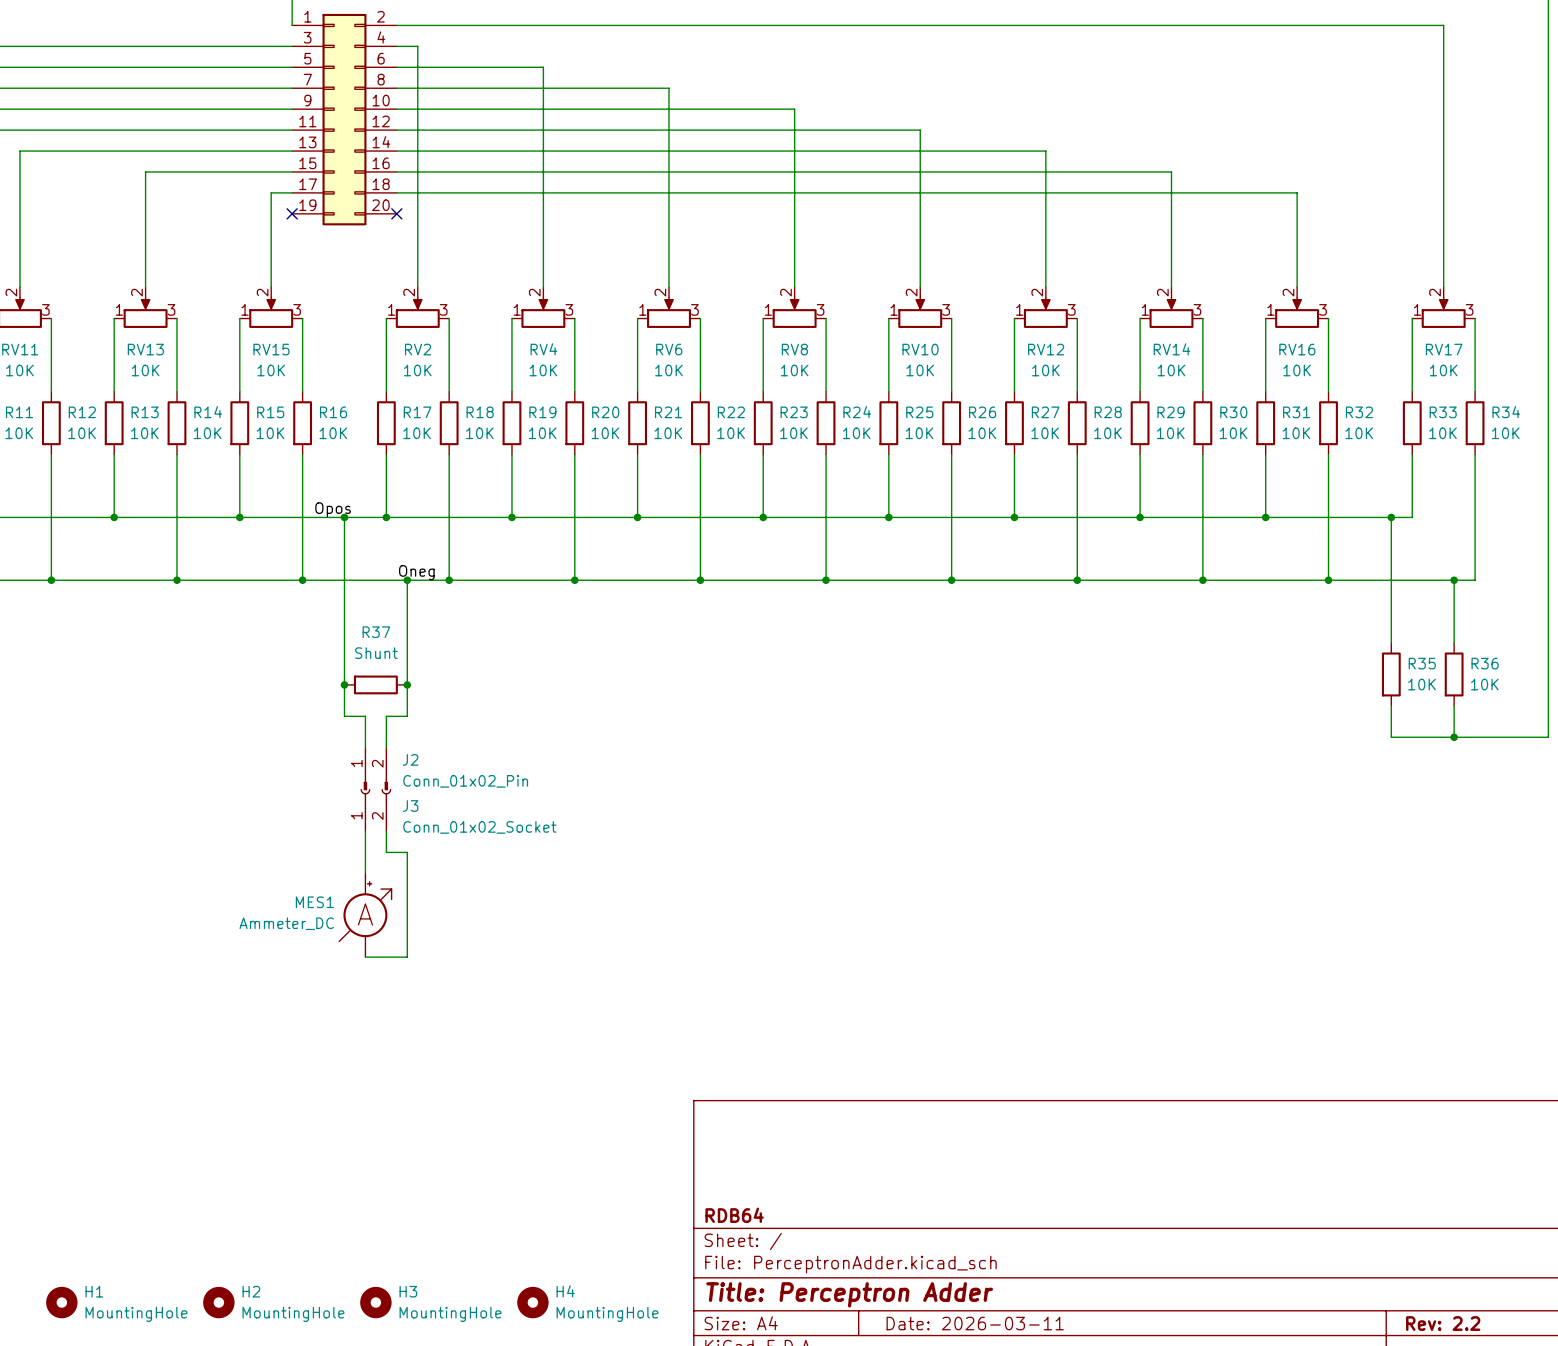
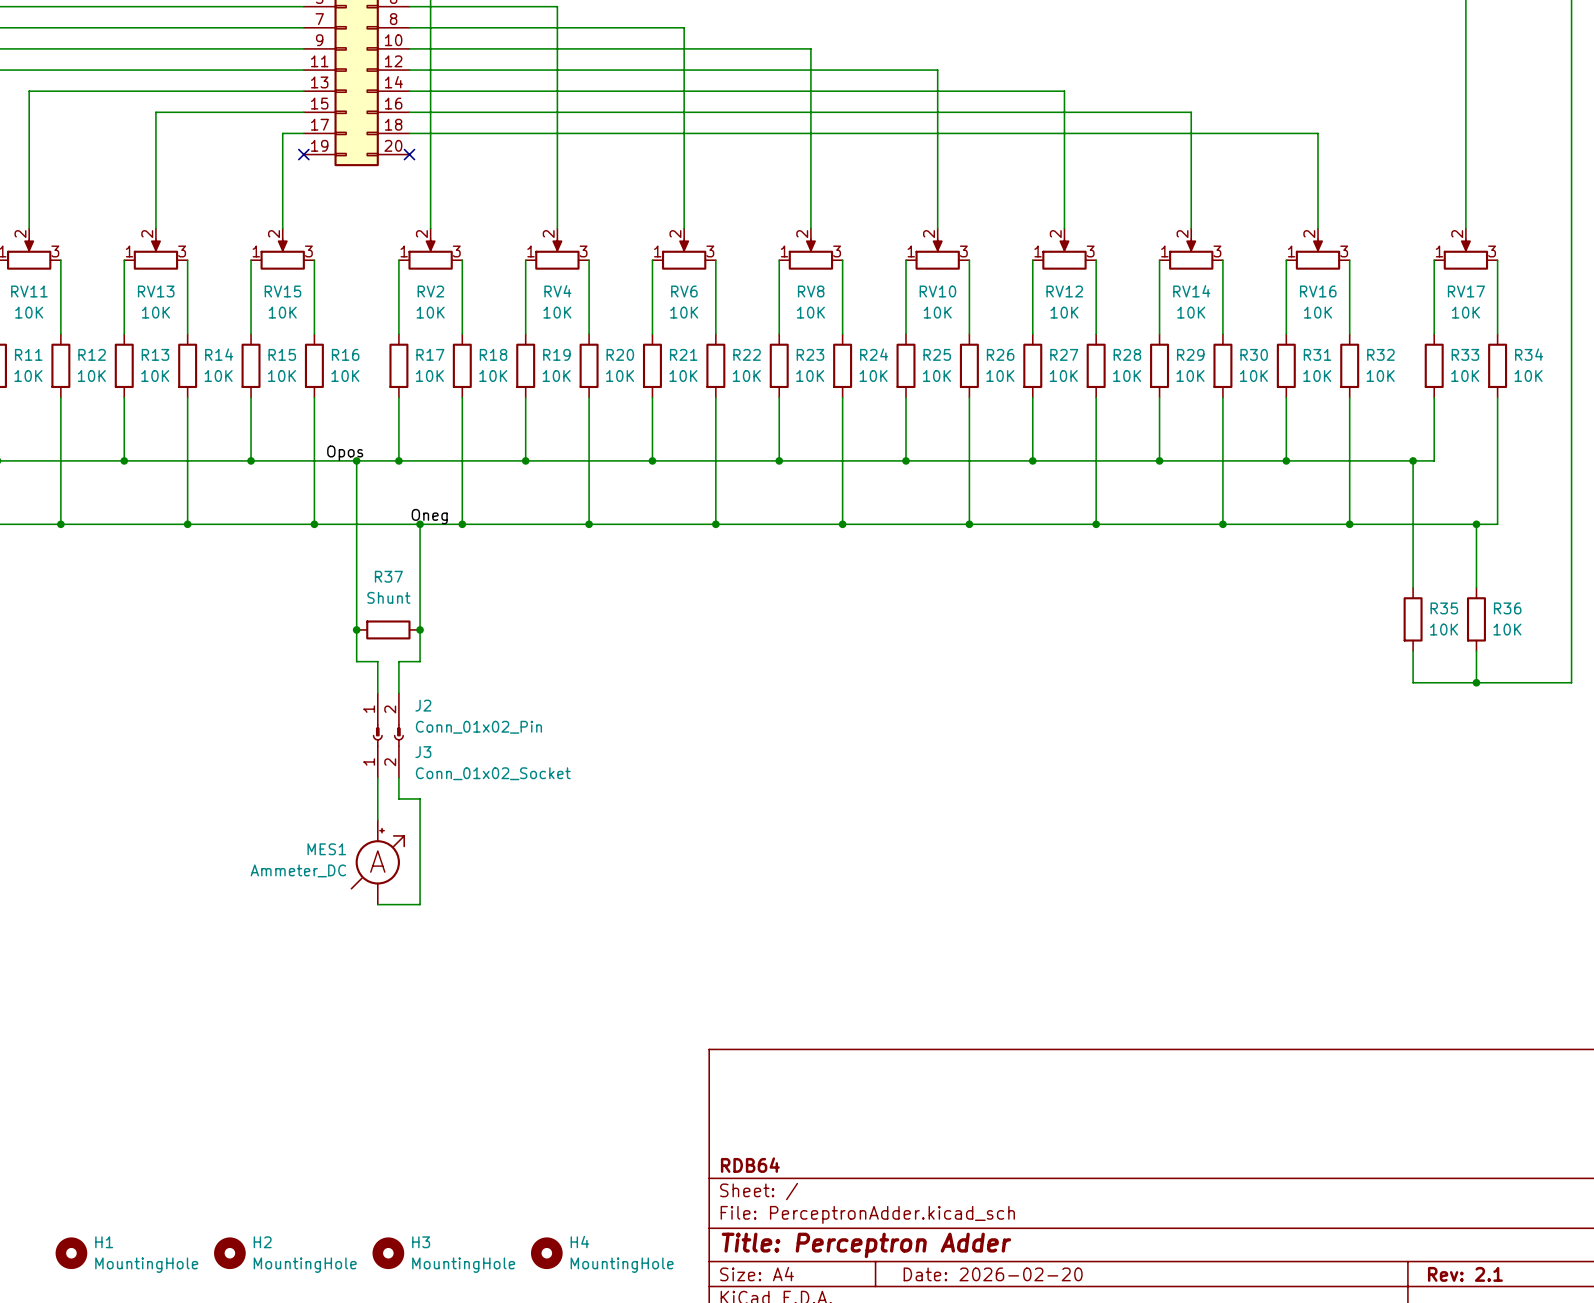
title block: Date: 2026-03-11 (975, 1323) -> Date: 2026-02-20 (993, 1274)
title block: Rev: 2.2 (1443, 1323) -> Rev: 2.1 (1465, 1274)

